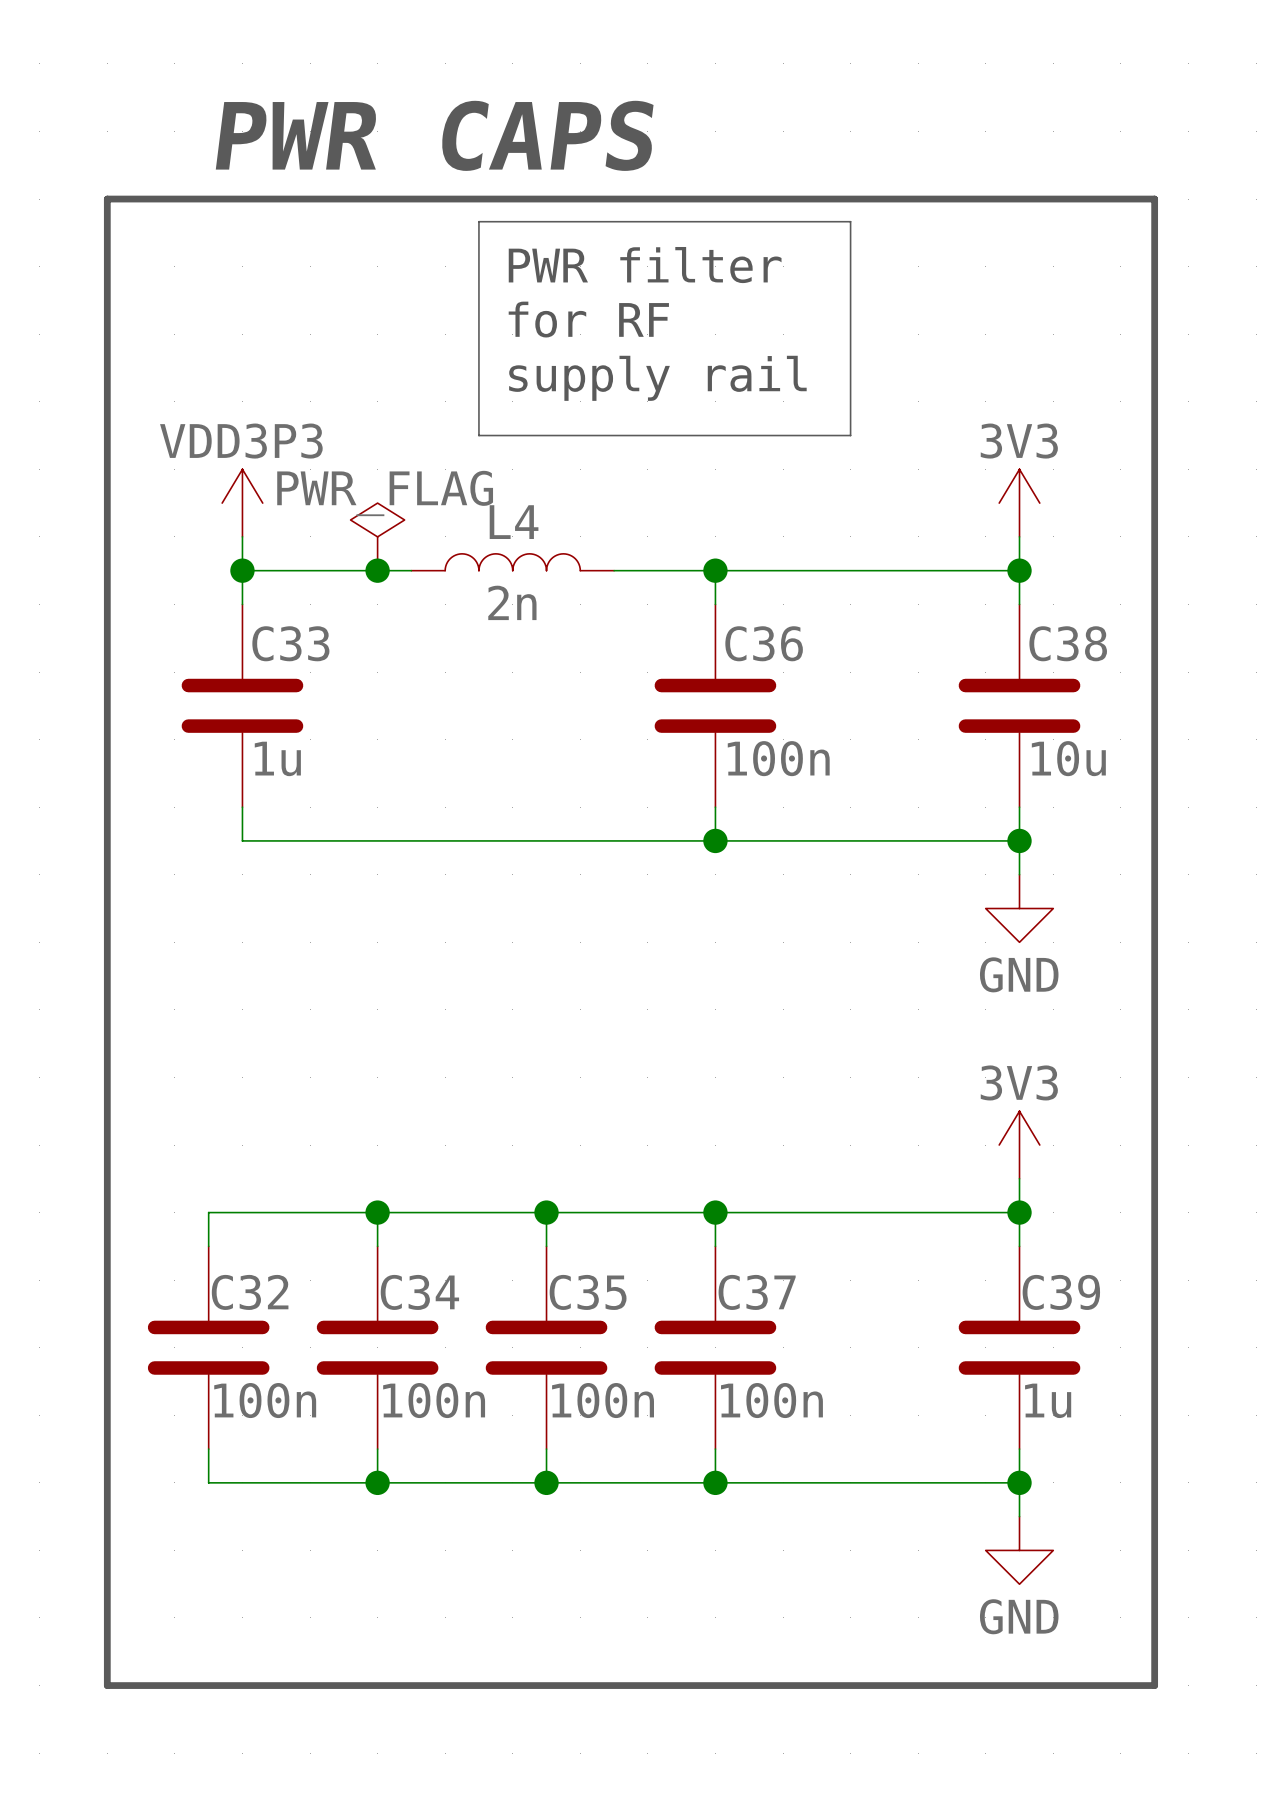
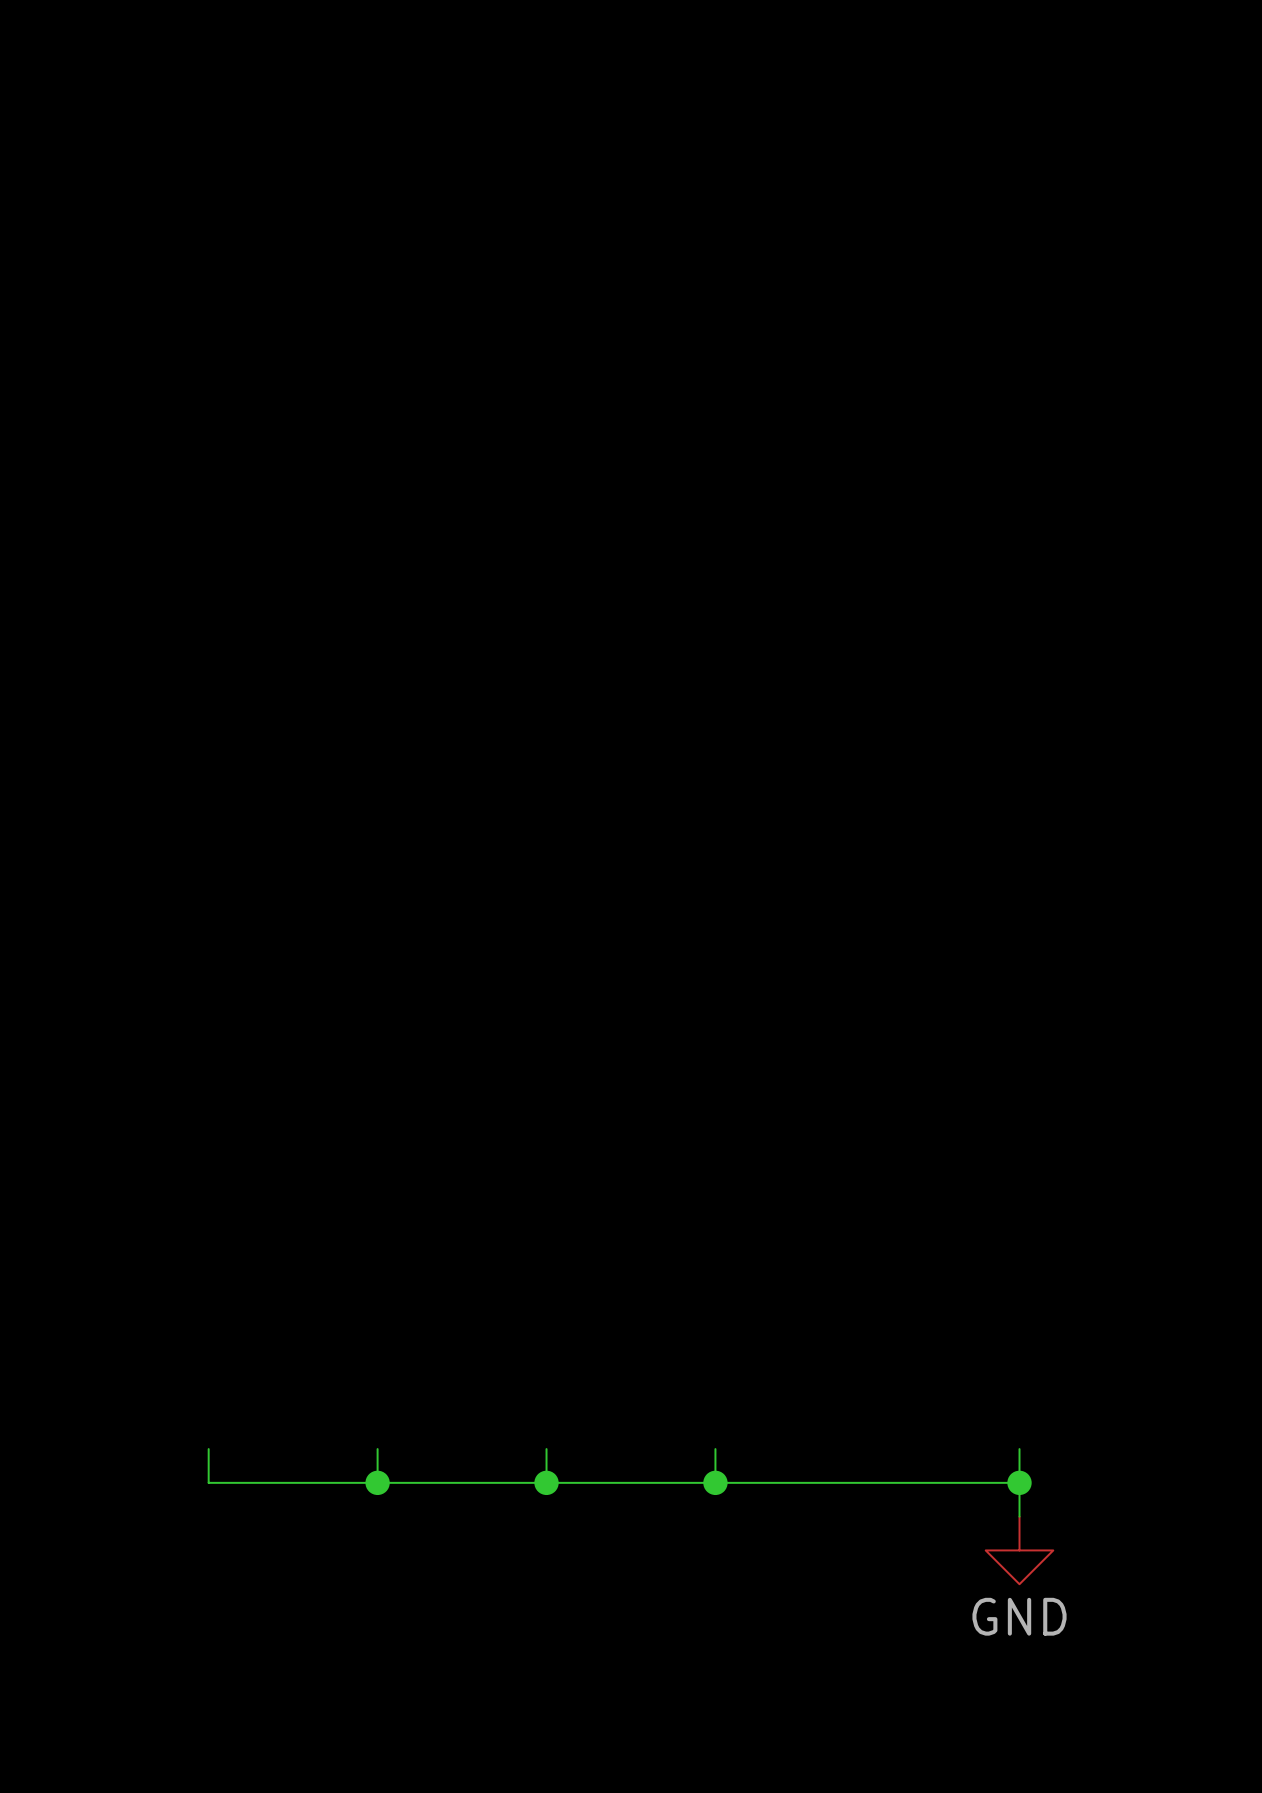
text: PWR CAPS (434, 135) -> none
line: (107, 199) (1154, 199) (1154, 1685) (107, 1685) (107, 199) -> none
line: (478, 221) (850, 221) (850, 435) (478, 435) (478, 221) -> none
text: PWR filter (645, 265) -> none
text: for RF (588, 319) -> none
text: supply rail (657, 378) -> none
power symbol: VDD3P3 (242, 503) -> none
power symbol: 3V3 (1019, 503) -> none
wire: (242, 536) (242, 604) -> none
power symbol: PWR_FLAG (377, 536) -> none
wire: (1019, 536) (1019, 604) -> none
L4: 2n (512, 562) -> none
wire: (242, 570) (411, 570) -> none
junction: (242, 570) -> none
junction: (377, 570) -> none
wire: (614, 570) (1019, 570) -> none
wire: (715, 570) (715, 604) -> none
junction: (715, 570) -> none
junction: (1019, 570) -> none
C33: 1u (242, 705) -> none
C36: 100n (715, 705) -> none
C38: 10u (1019, 705) -> none
wire: (242, 807) (242, 840) (1019, 840) -> none
wire: (715, 807) (715, 840) -> none
wire: (1019, 807) (1019, 874) -> none
junction: (715, 840) -> none
junction: (1019, 840) -> none
power symbol: GND (1019, 908) -> none
power symbol: 3V3 (1019, 1145) -> none
wire: (1019, 1178) (1019, 1246) -> none
wire: (377, 1212) (377, 1246) -> none
junction: (377, 1212) -> none
wire: (546, 1212) (546, 1246) -> none
junction: (546, 1212) -> none
wire: (715, 1212) (715, 1246) -> none
junction: (715, 1212) -> none
wire: (1019, 1212) (208, 1212) (208, 1246) -> none
junction: (1019, 1212) -> none
C32: 100n (208, 1347) -> none
C34: 100n (377, 1347) -> none
C35: 100n (546, 1347) -> none
C37: 100n (715, 1347) -> none
C39: 1u (1019, 1347) -> none

